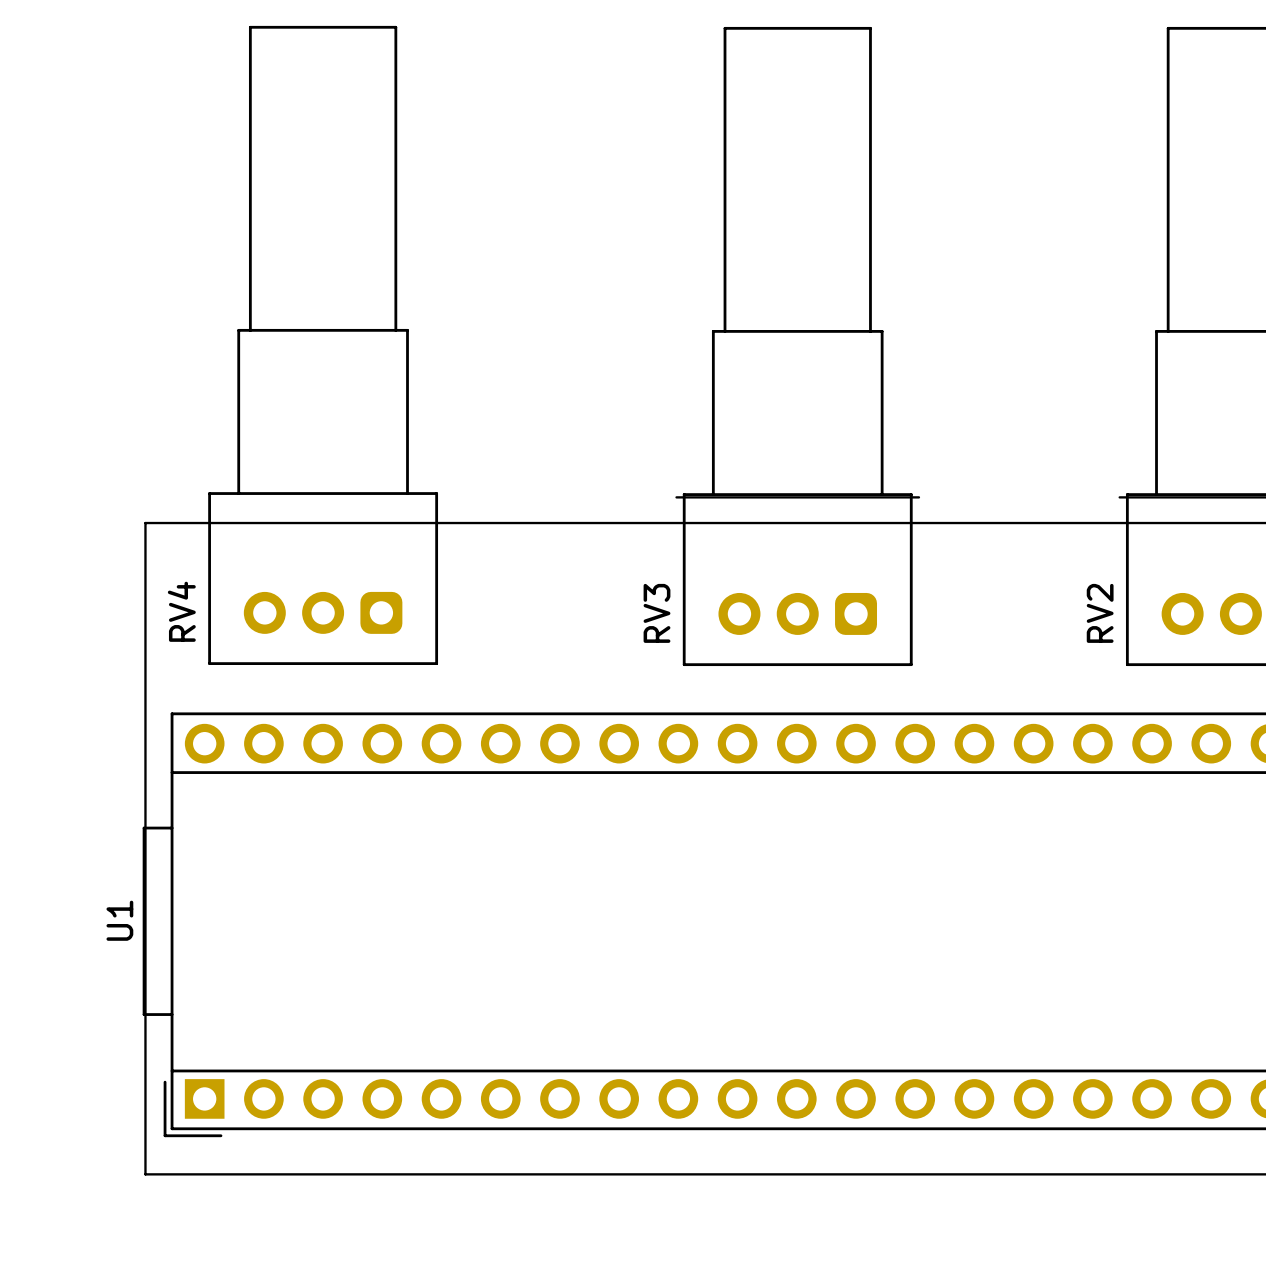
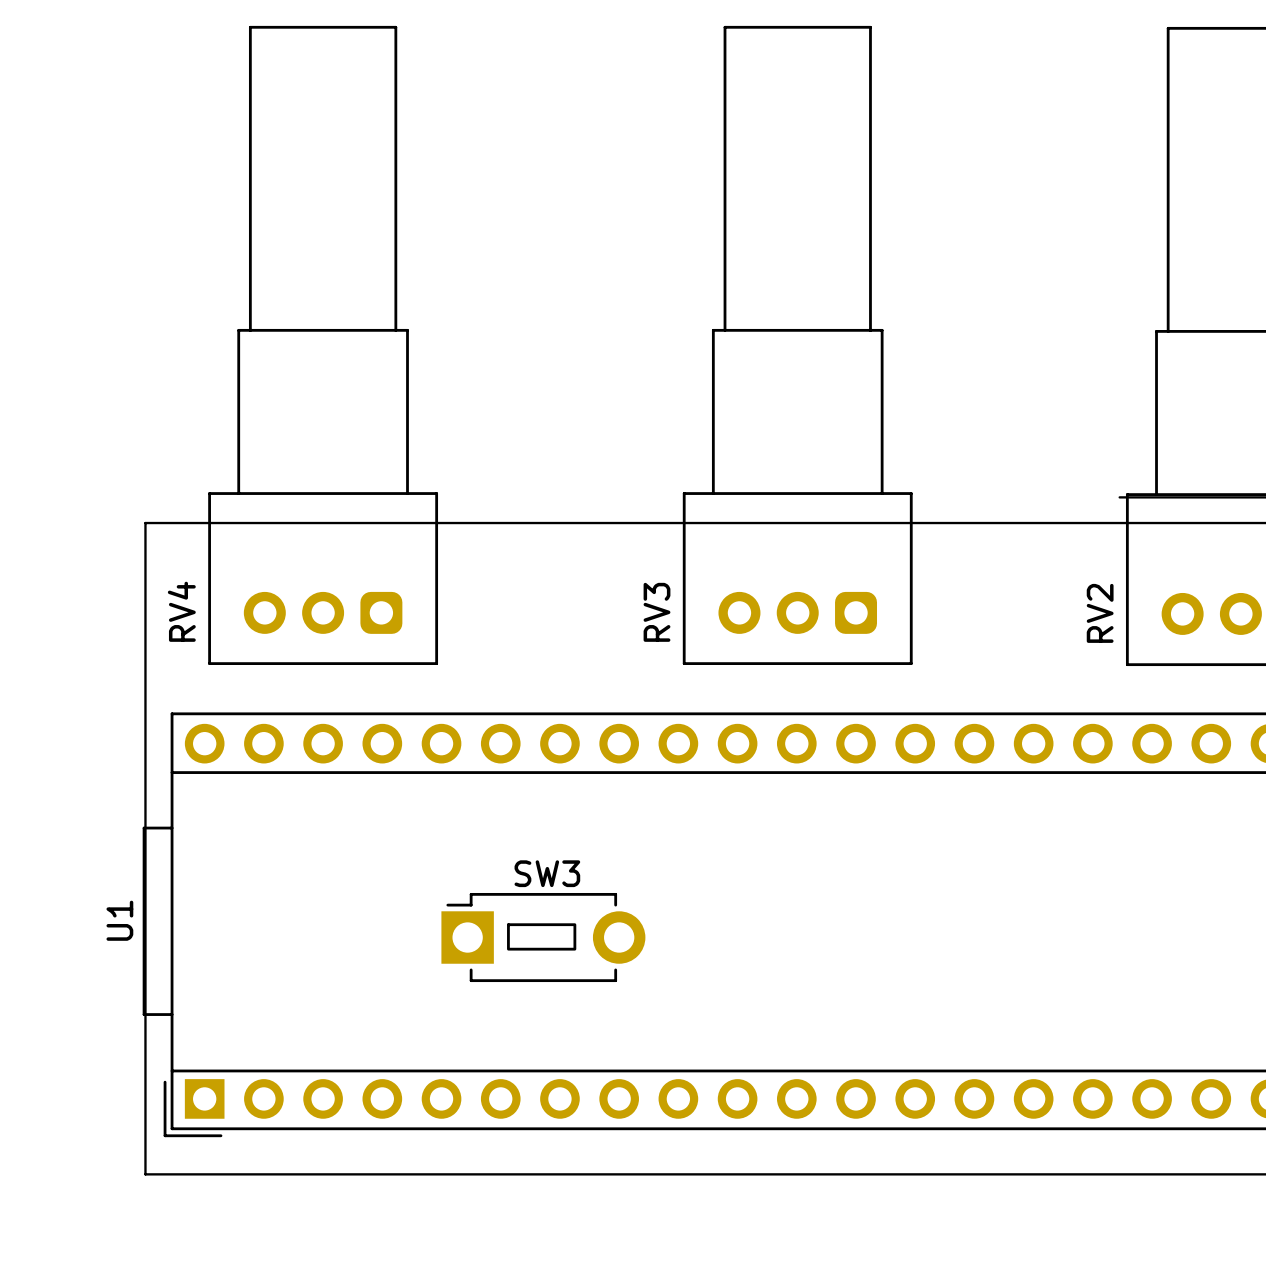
RV3 footprint: [675, 26, 921, 667] -> [682, 25, 913, 666]
SW3: none -> (543, 937)

